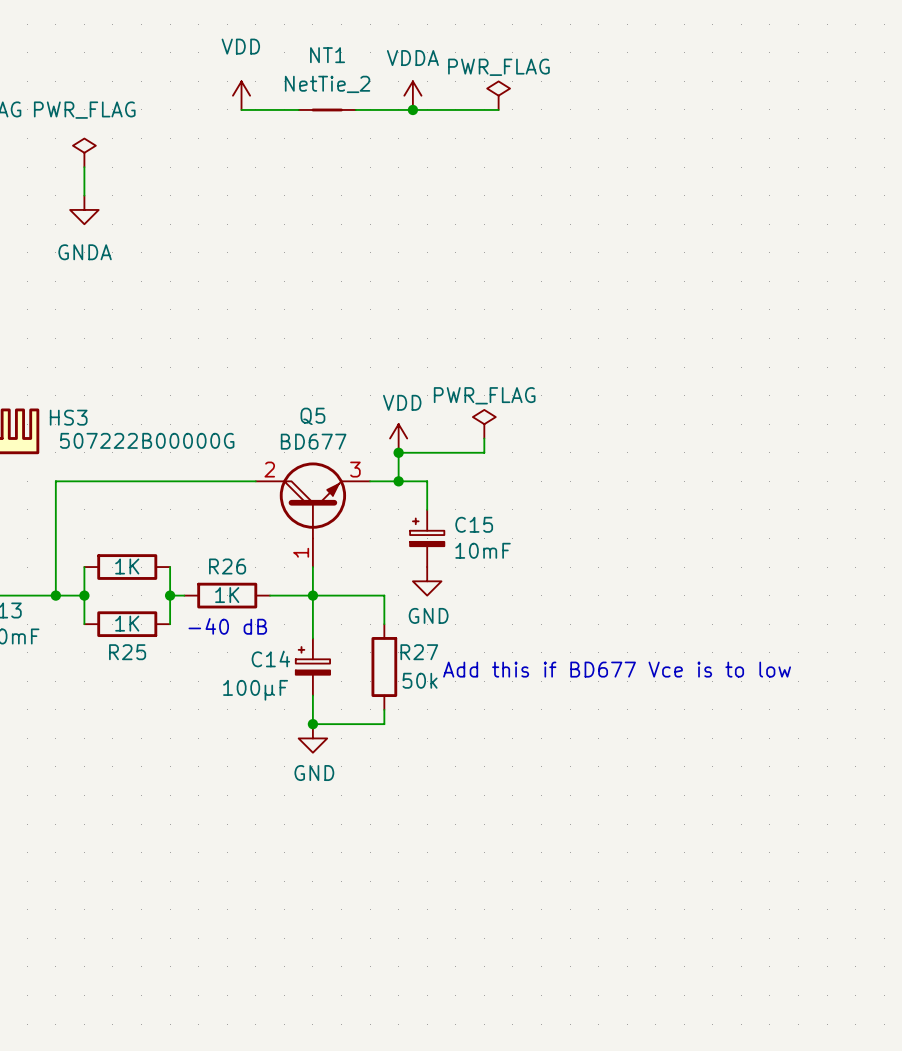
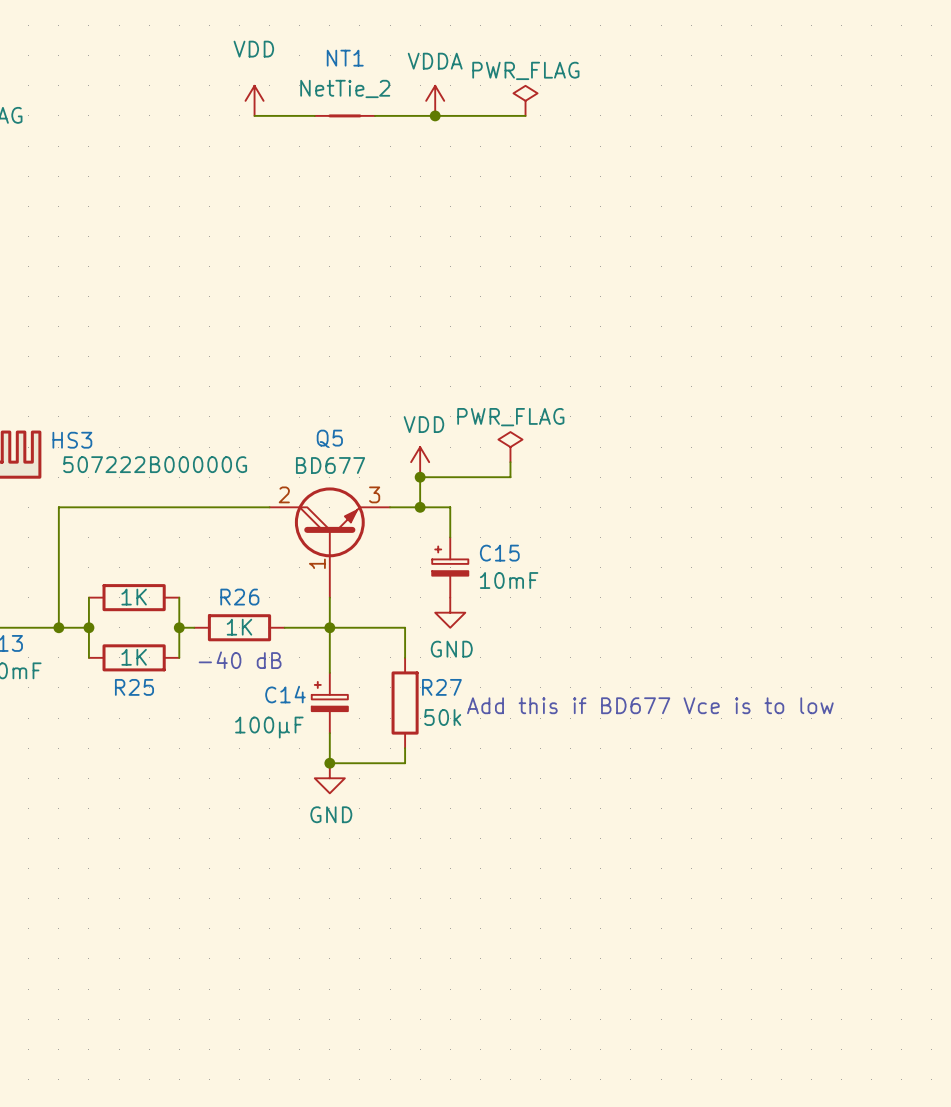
power symbol: PWR_FLAG (84, 152) -> none
wire: (84, 167) (84, 195) -> none
power symbol: GNDA (84, 209) -> none
Q5 symbol: [255, 462, 371, 568] -> [269, 487, 391, 598]

